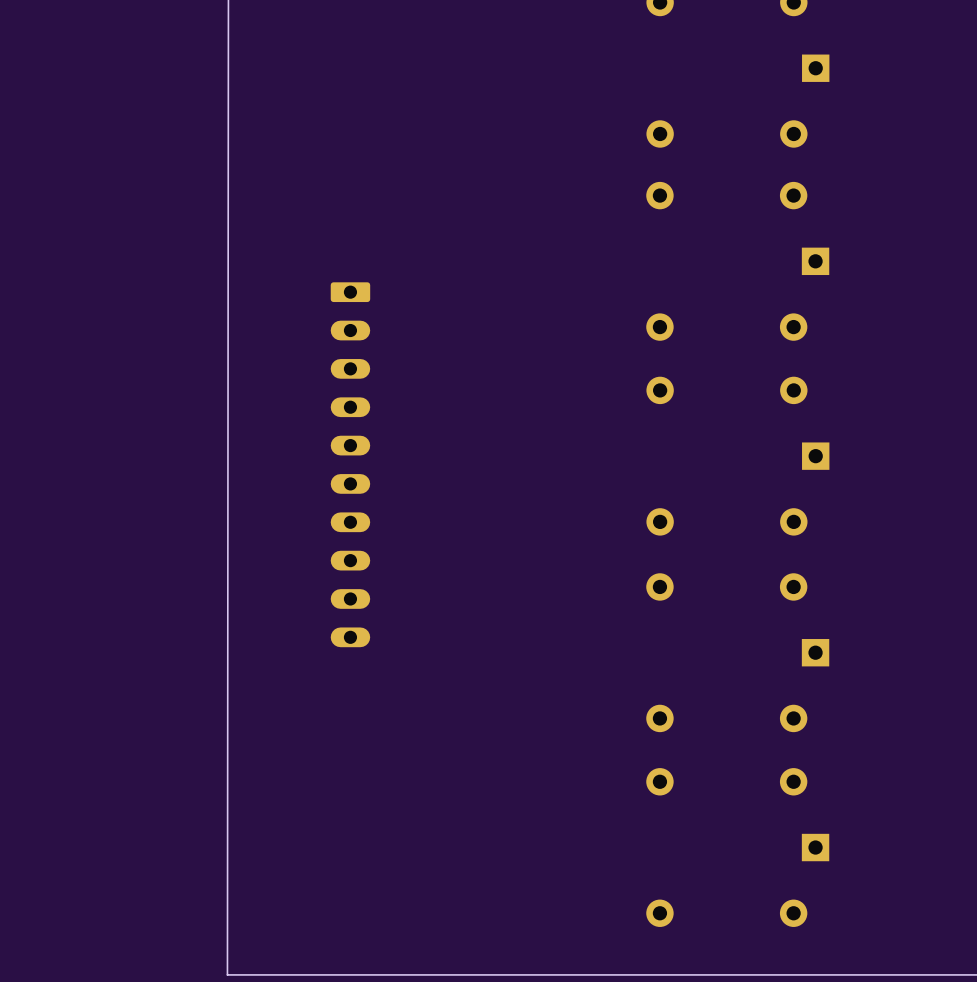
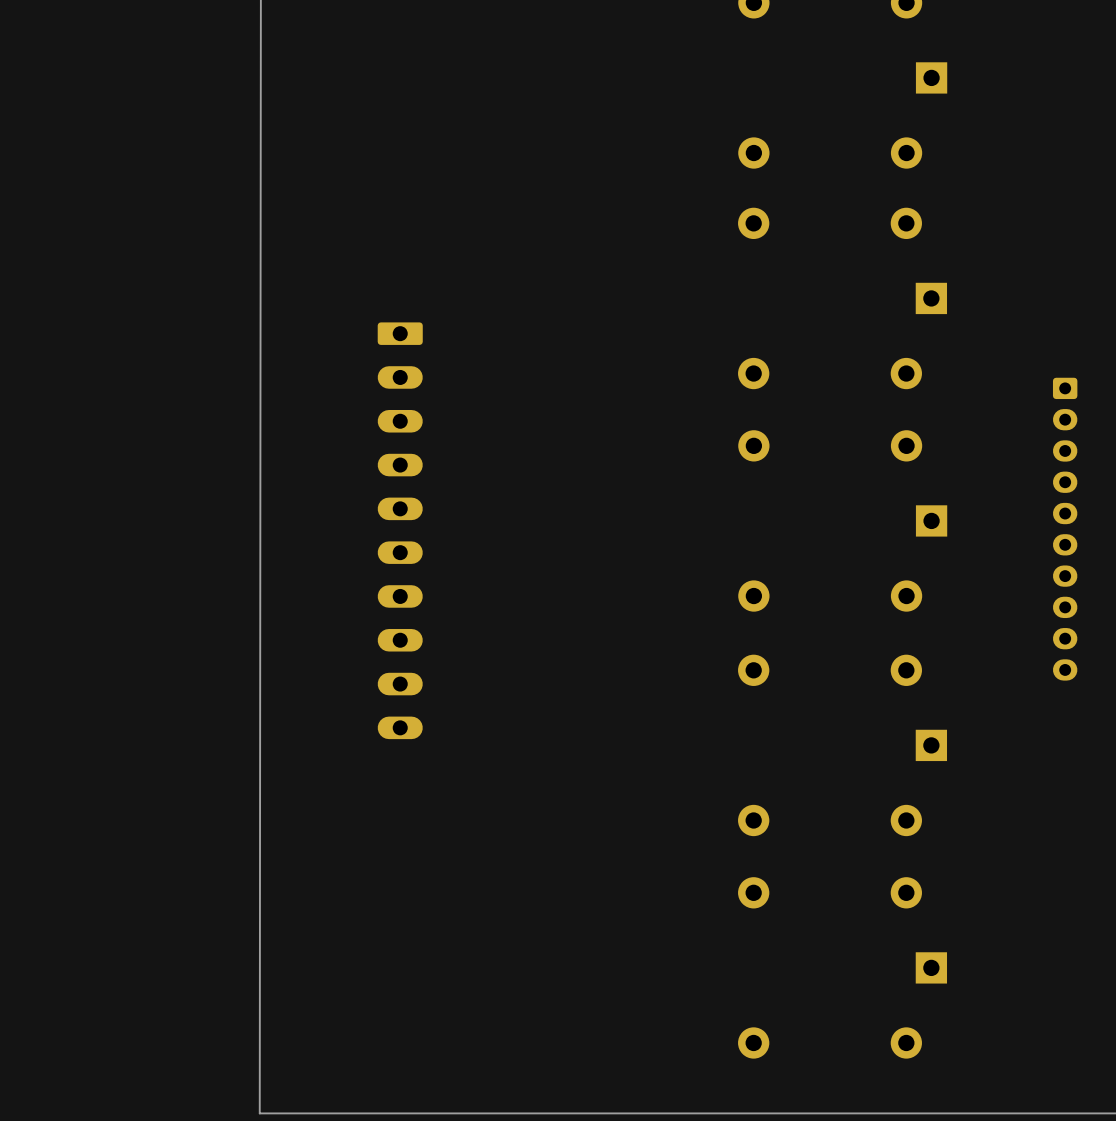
part: none -> (1065, 529)

